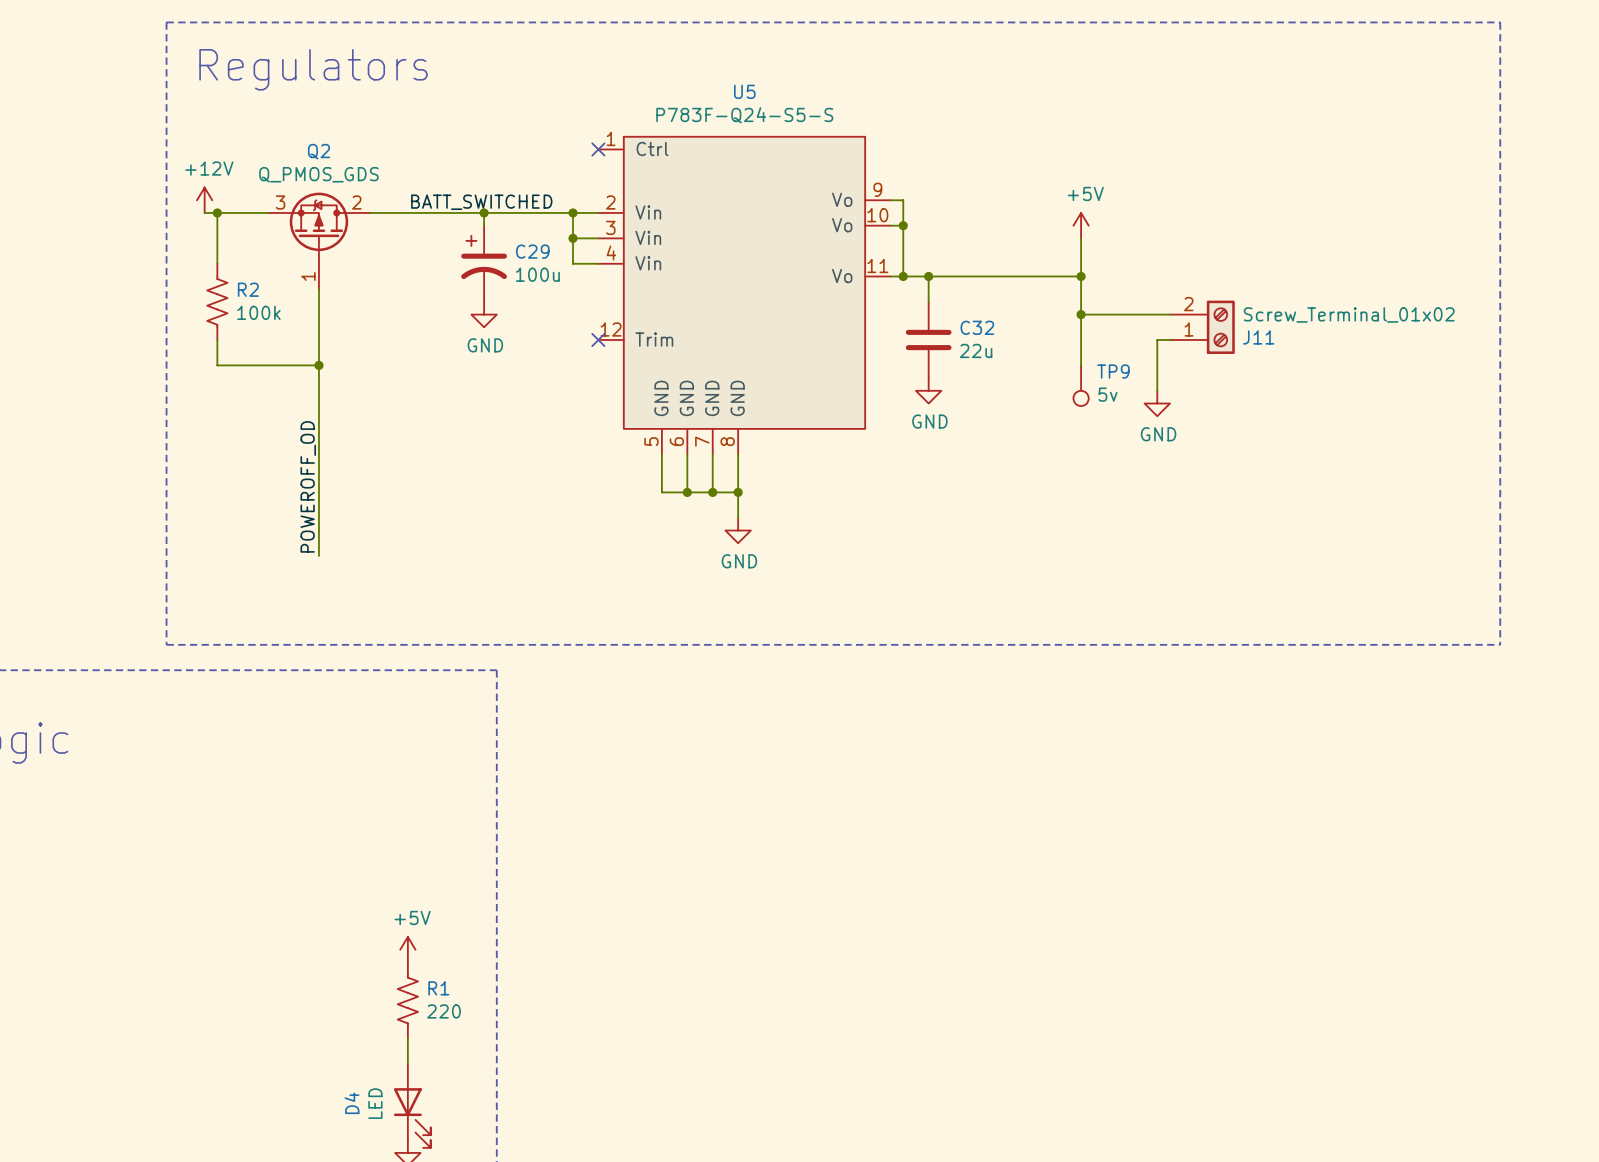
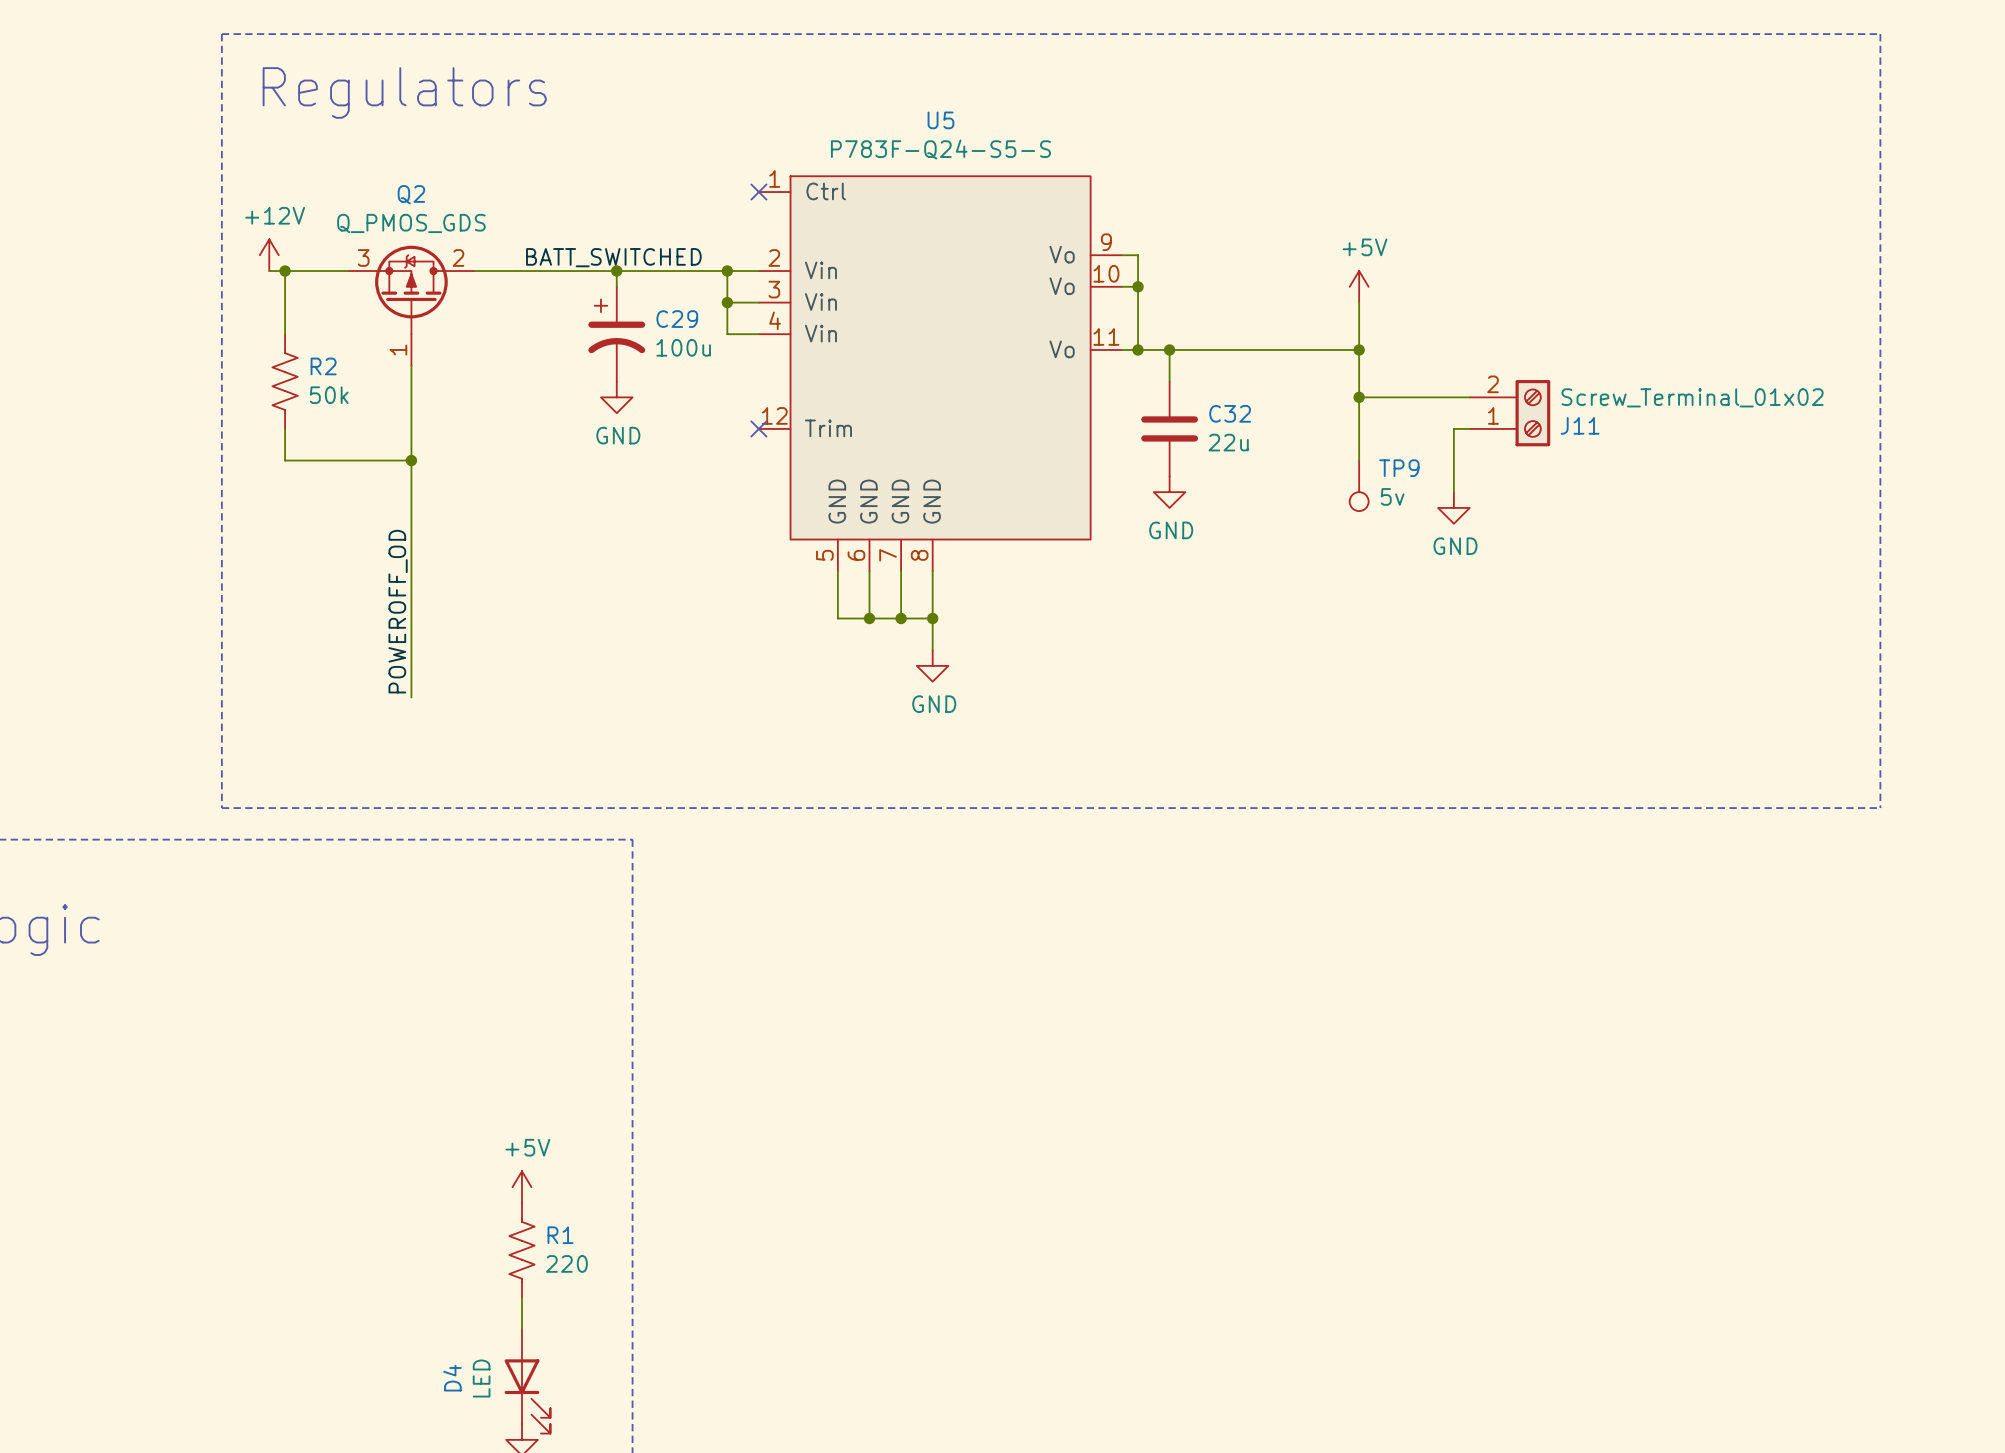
R2 value: 100k (258, 312) -> 50k (329, 395)

